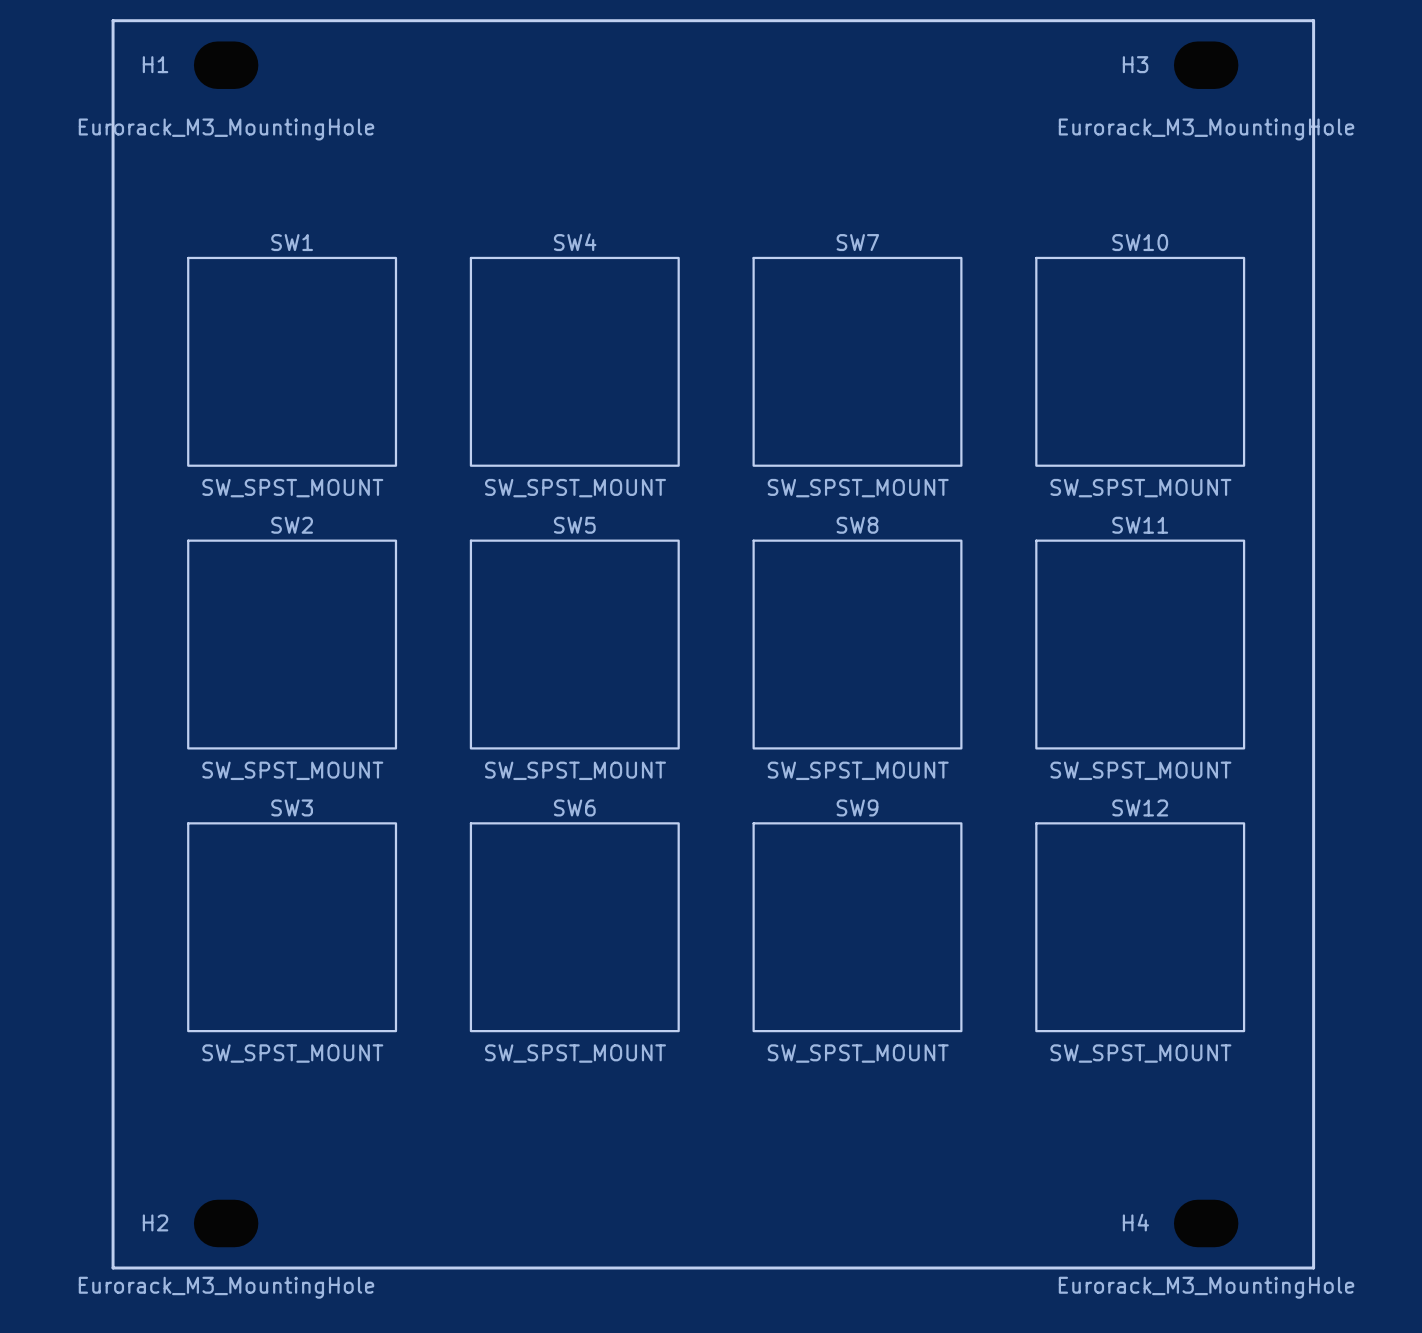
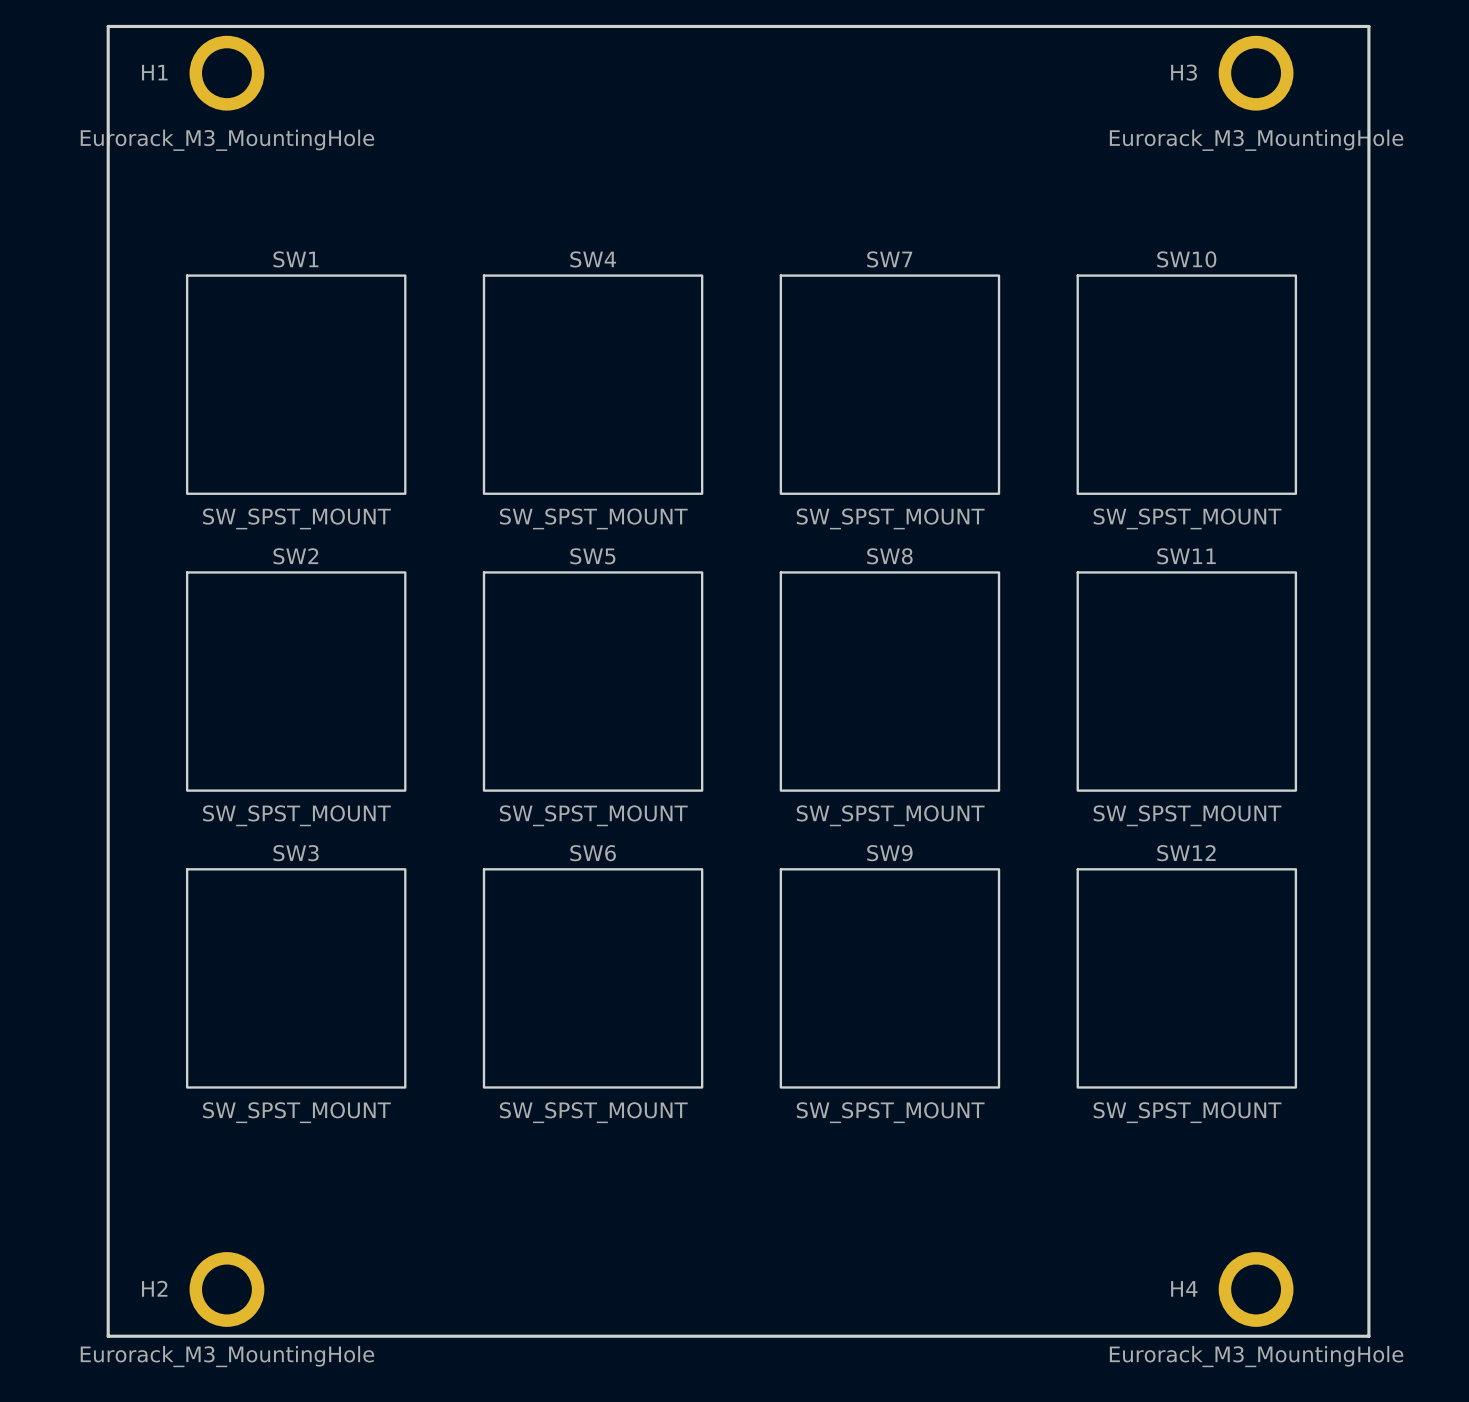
H1 footprint: [193, 41, 259, 89] -> [189, 35, 265, 111]
H3 footprint: [1173, 41, 1239, 89] -> [1218, 35, 1294, 111]
H2 footprint: [193, 1199, 259, 1248] -> [189, 1252, 265, 1327]
H4 footprint: [1173, 1199, 1239, 1248] -> [1218, 1252, 1294, 1327]

